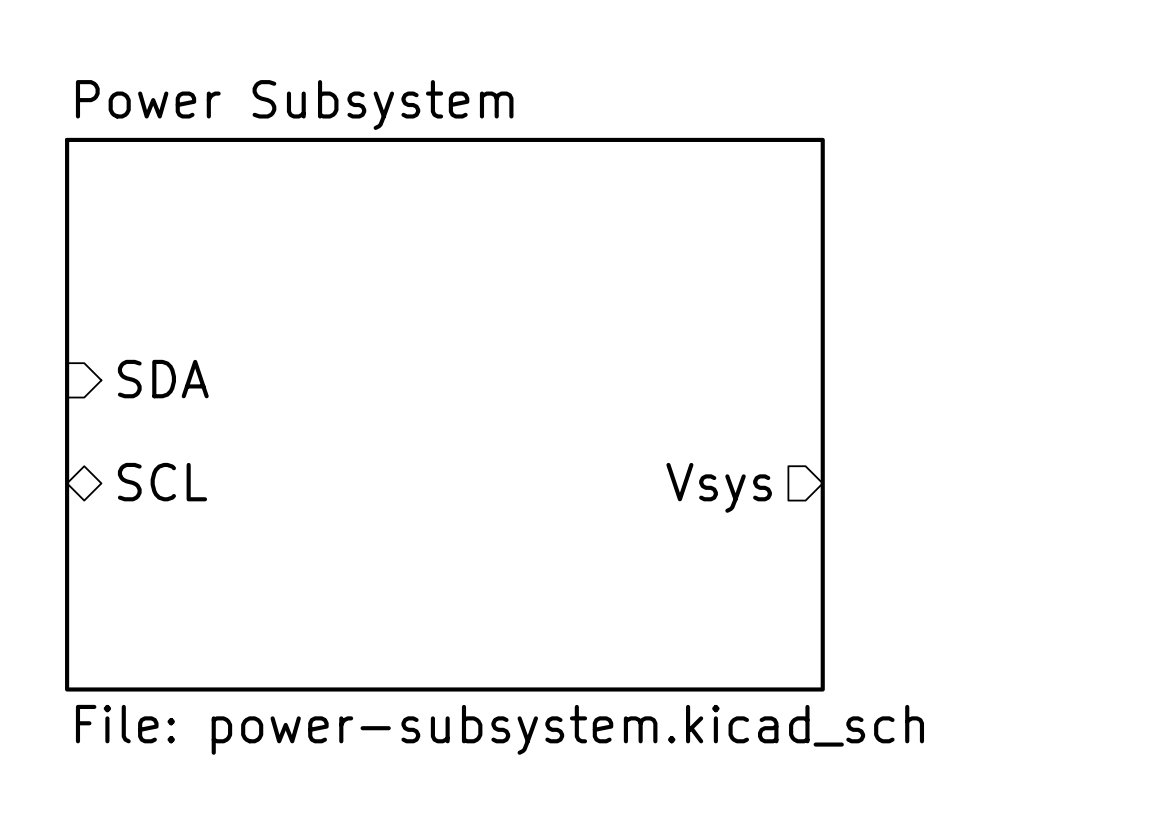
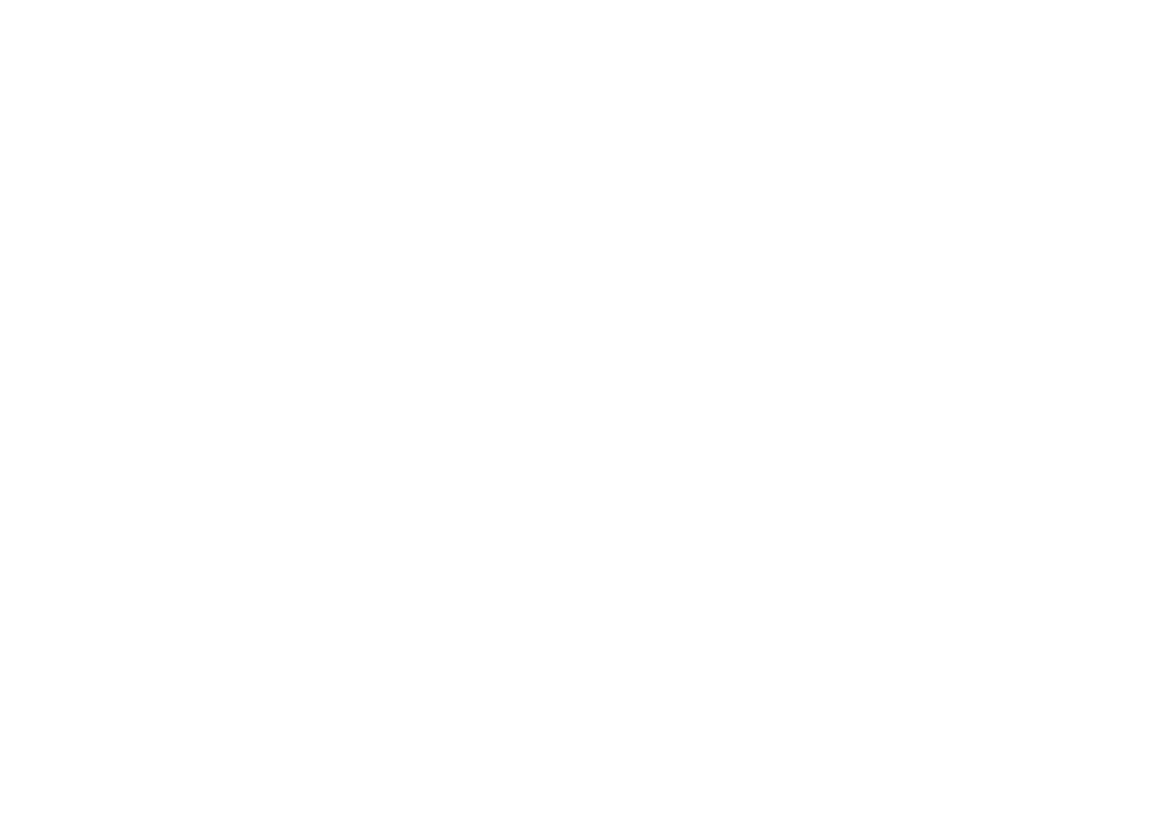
sheet pin: SDA (163, 379) -> none
sheet Power Subsystem: File: power-subsystem.kicad_sch (444, 414) -> none
sheet pin: SCL (162, 482) -> none
sheet pin: Vsys (719, 487) -> none

